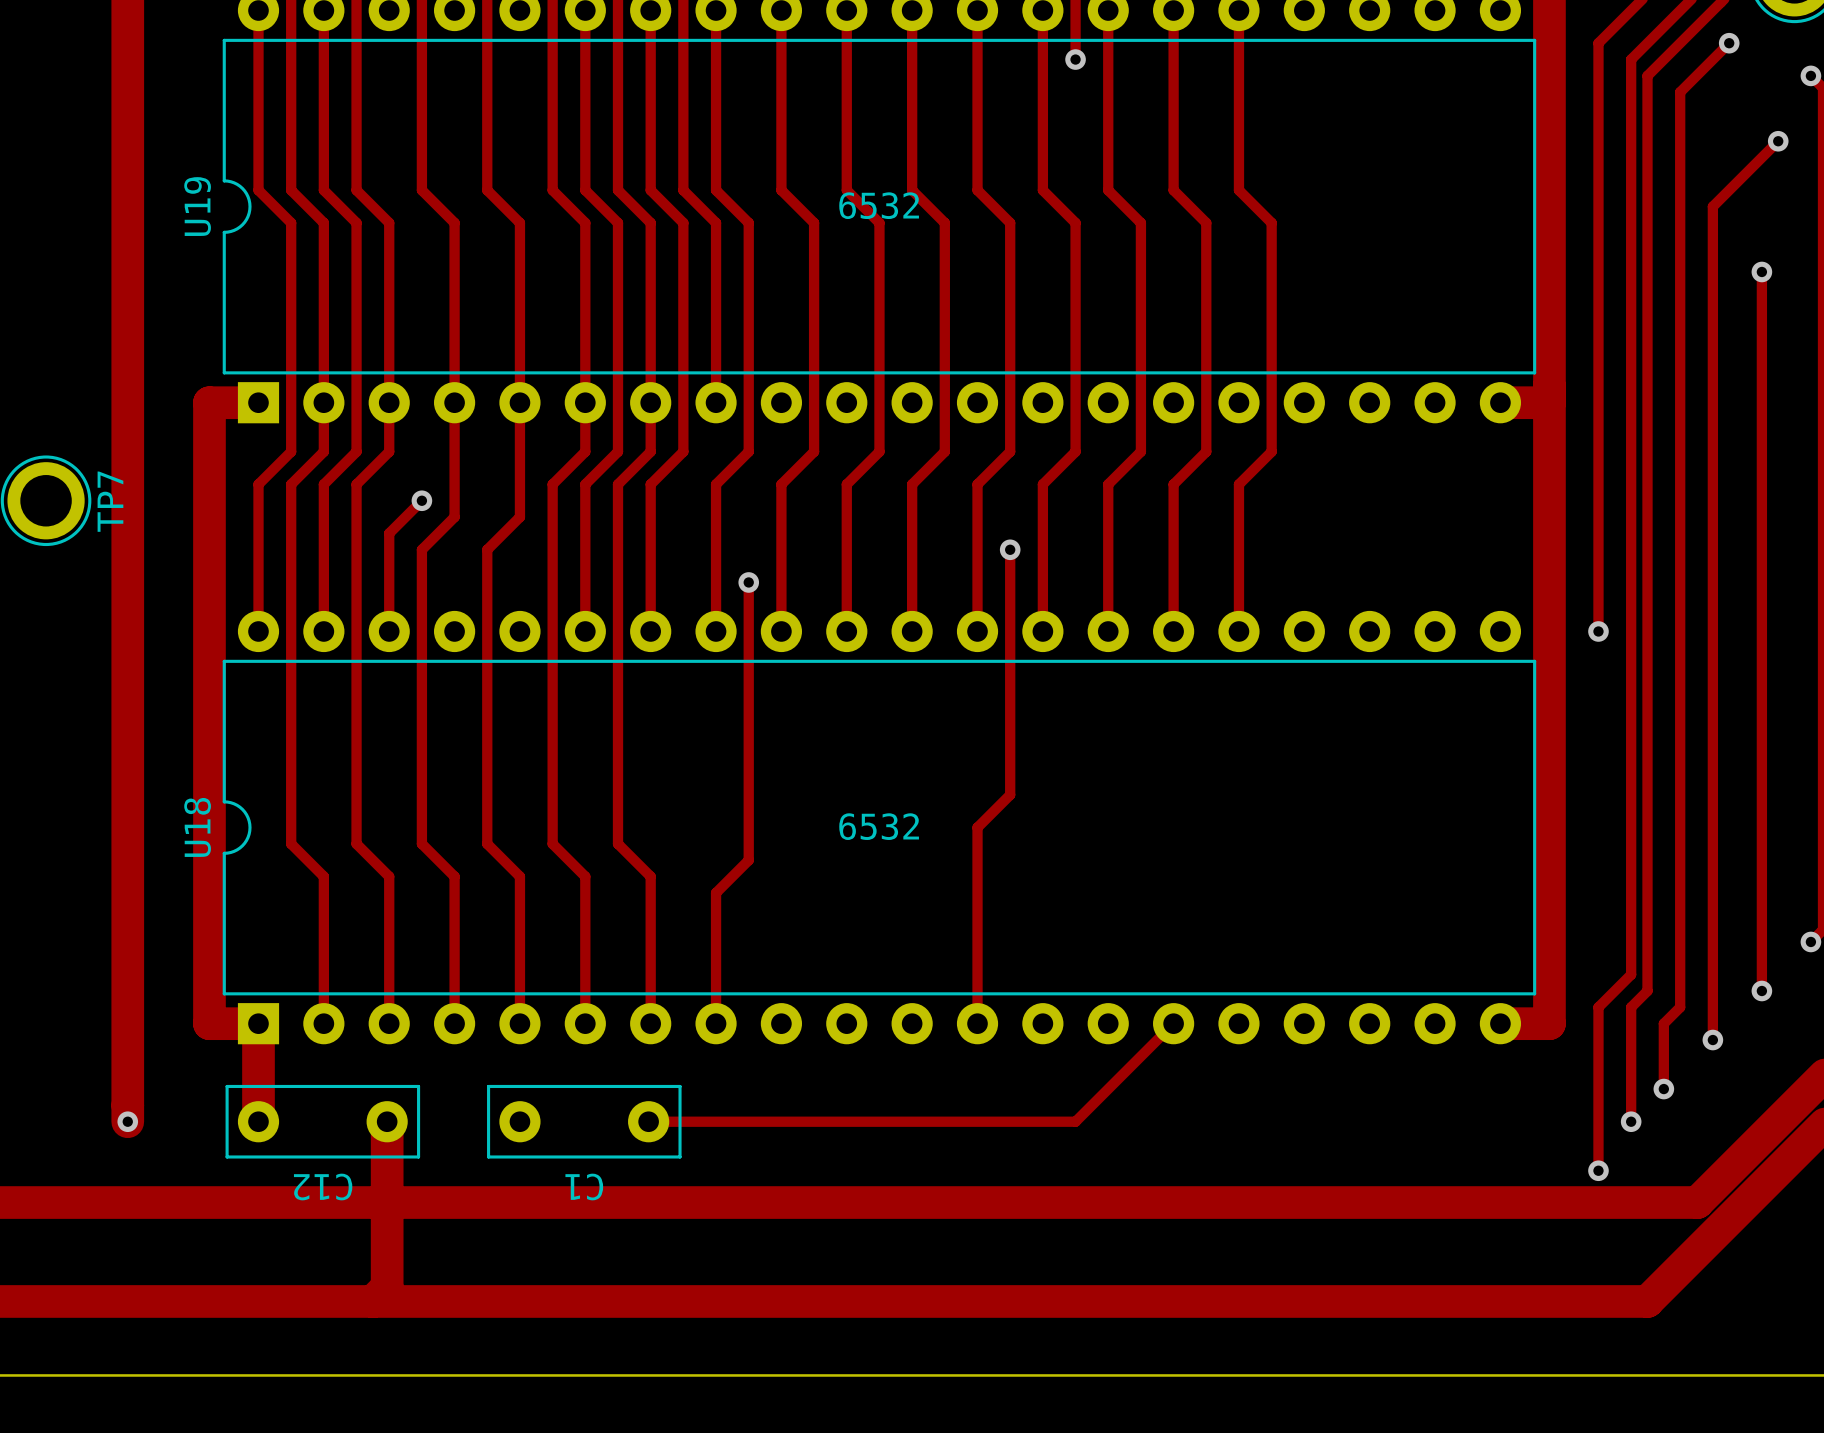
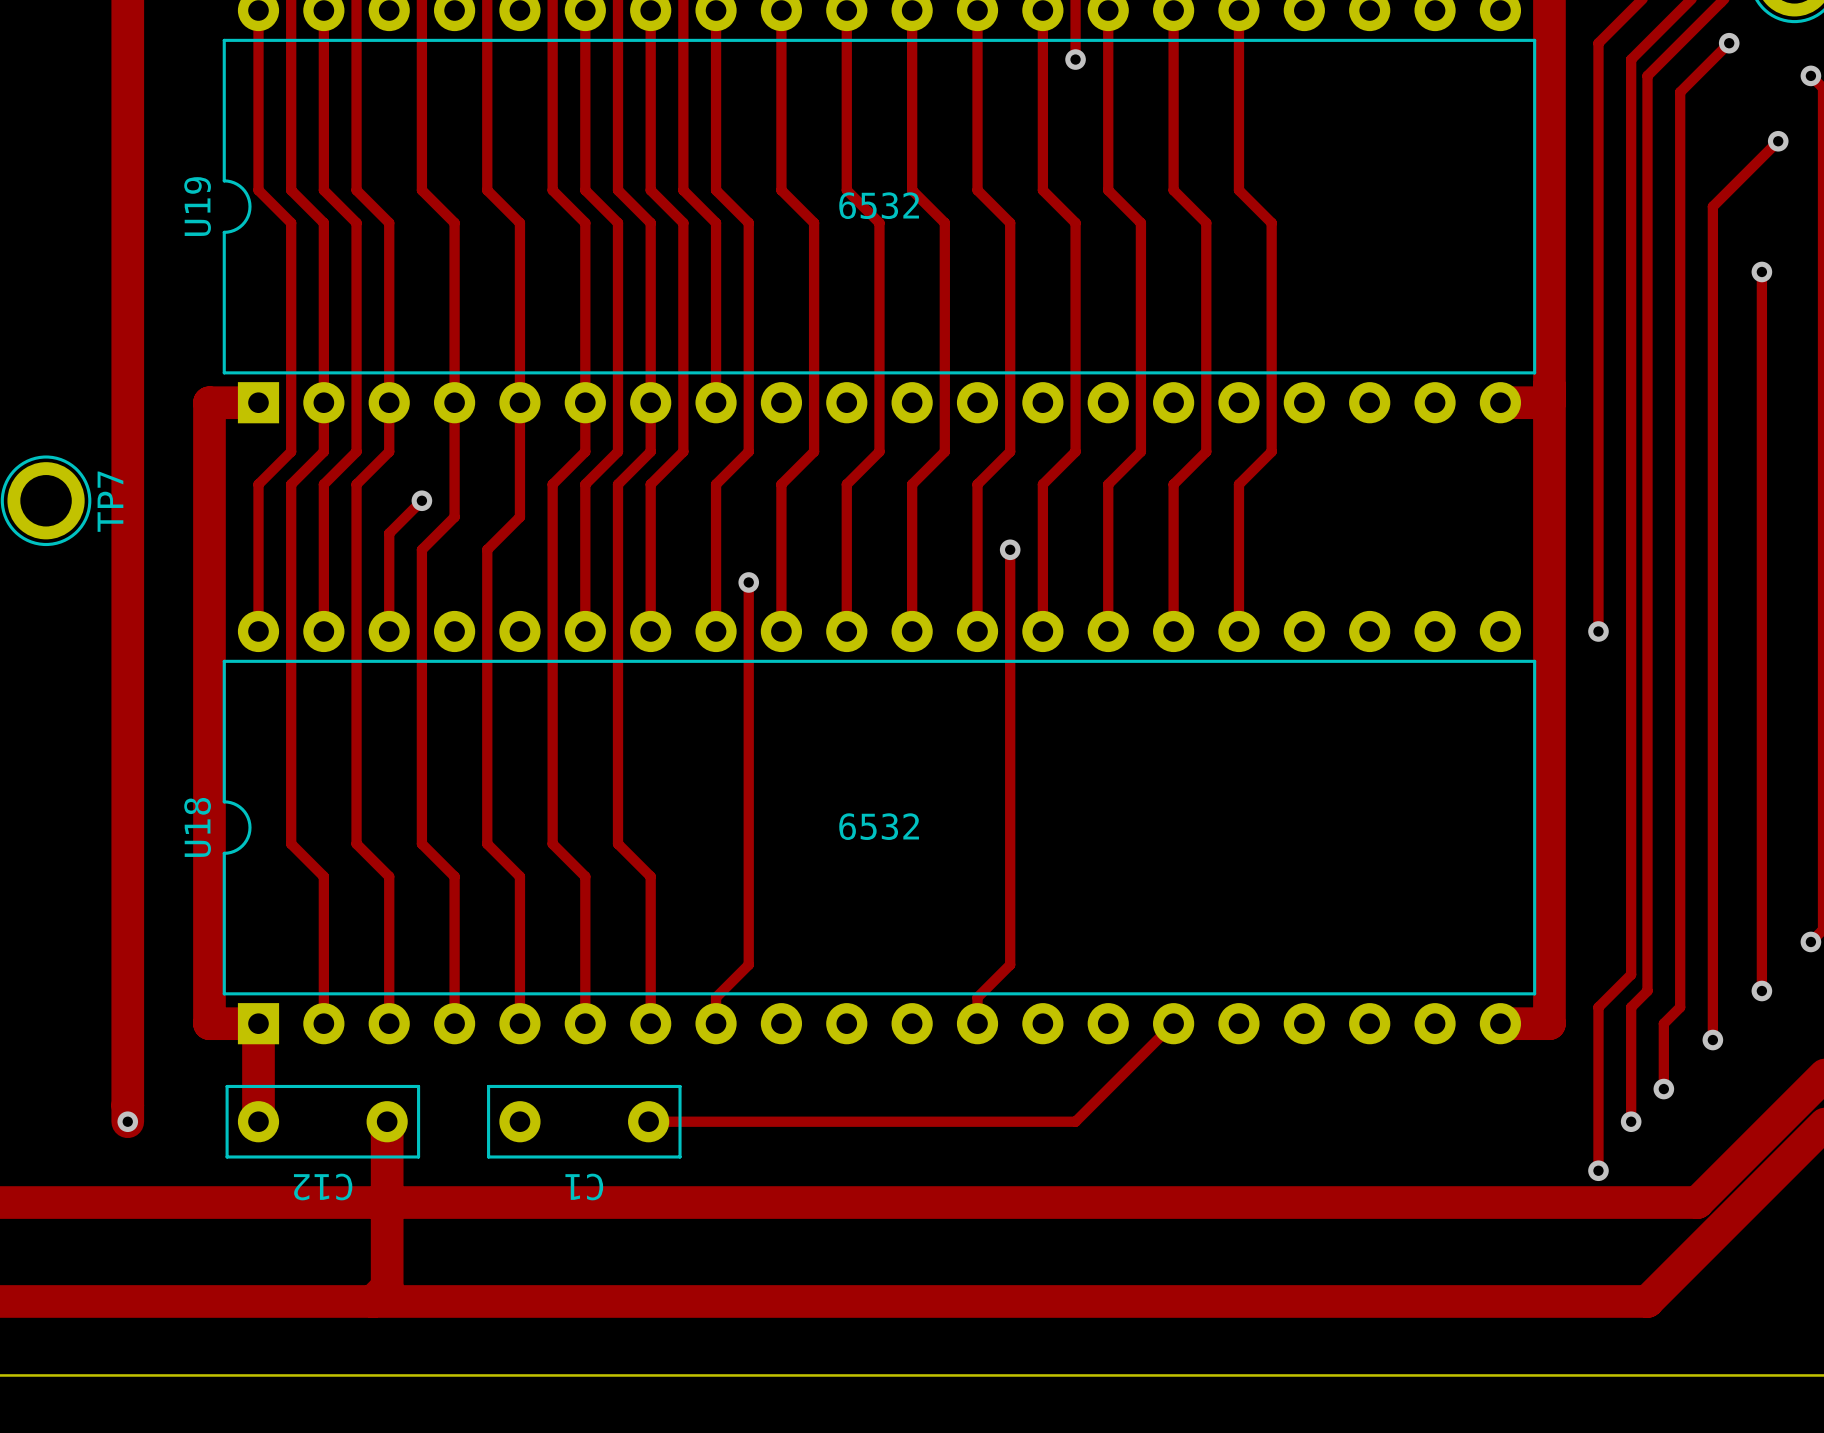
track: (1010, 794) (977, 827) (977, 997) -> (1010, 794) (1010, 964) (977, 997)
track: (748, 860) (716, 892) (716, 997) -> (748, 860) (748, 964) (716, 997)

